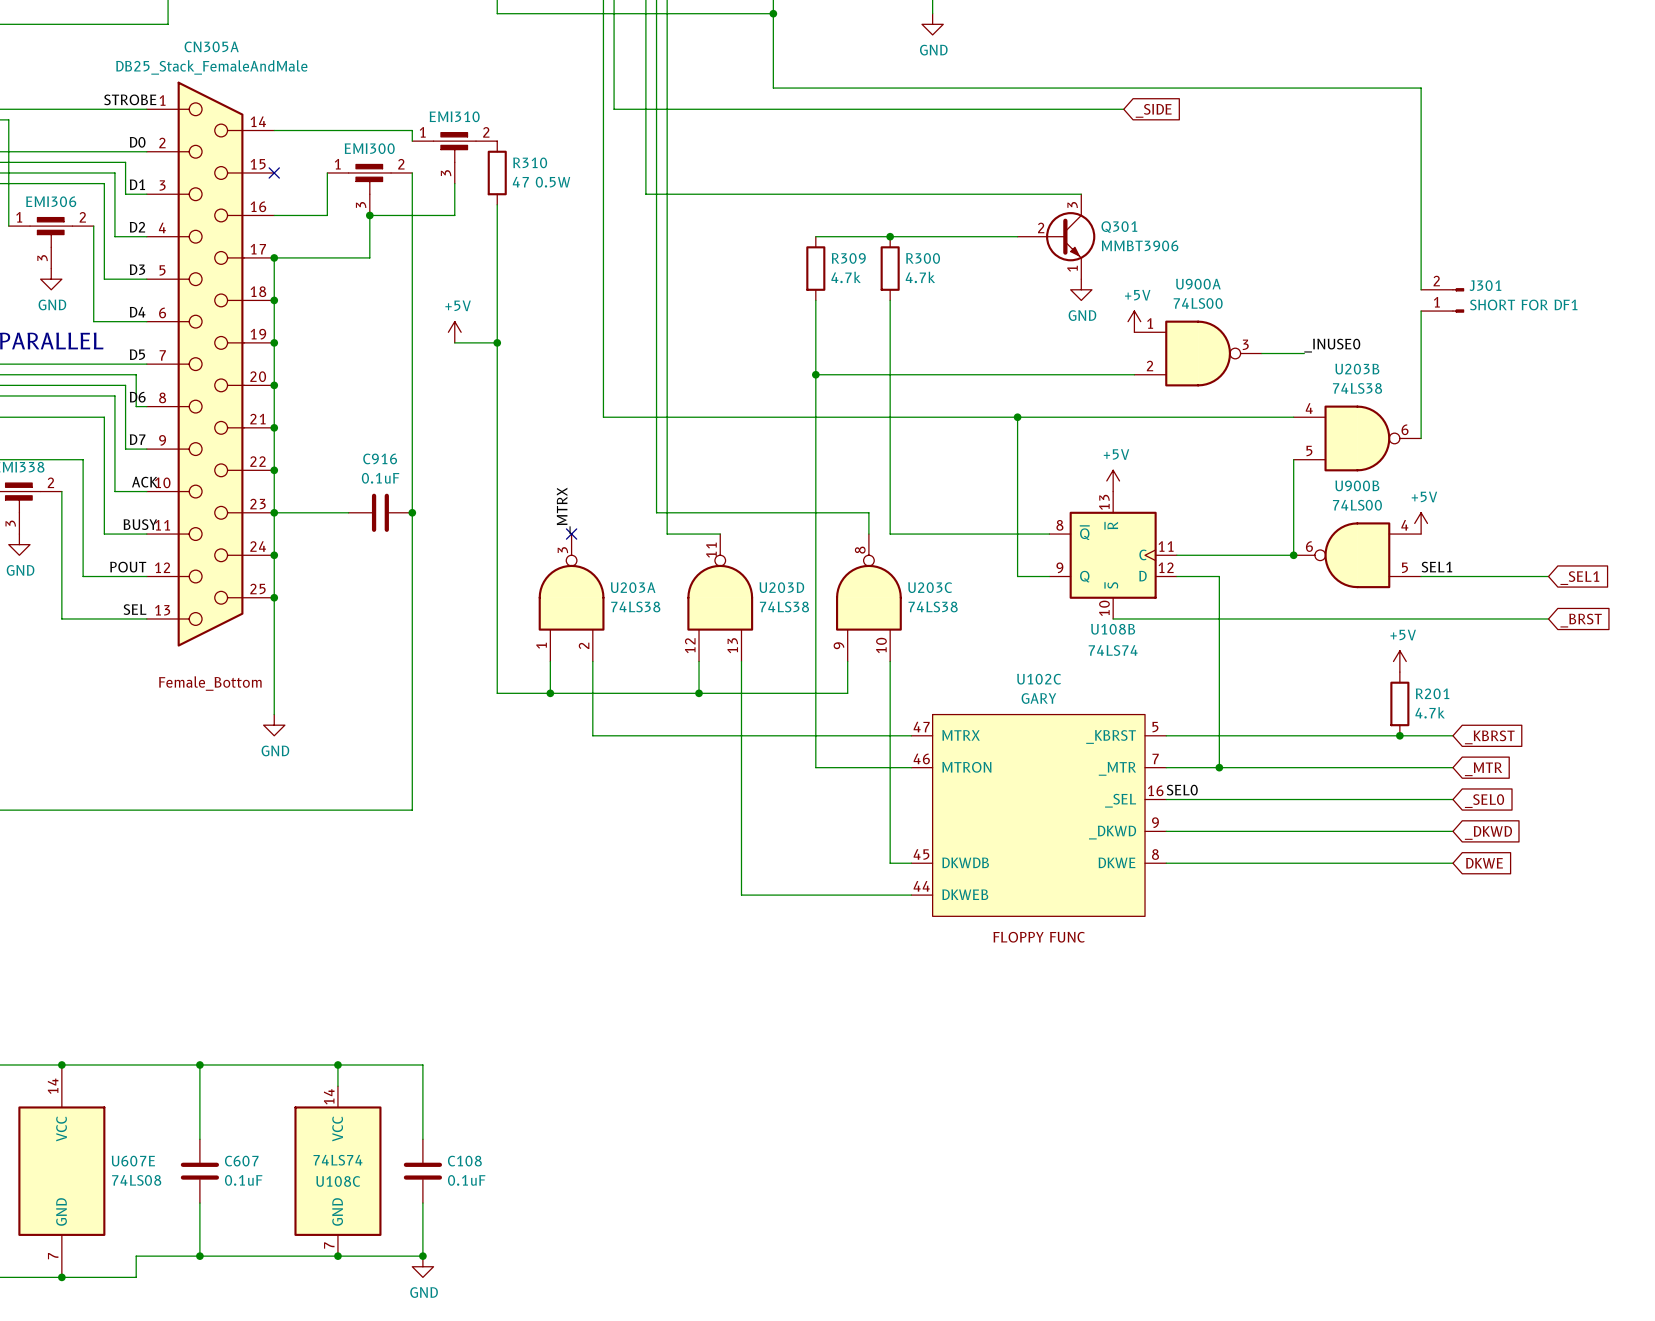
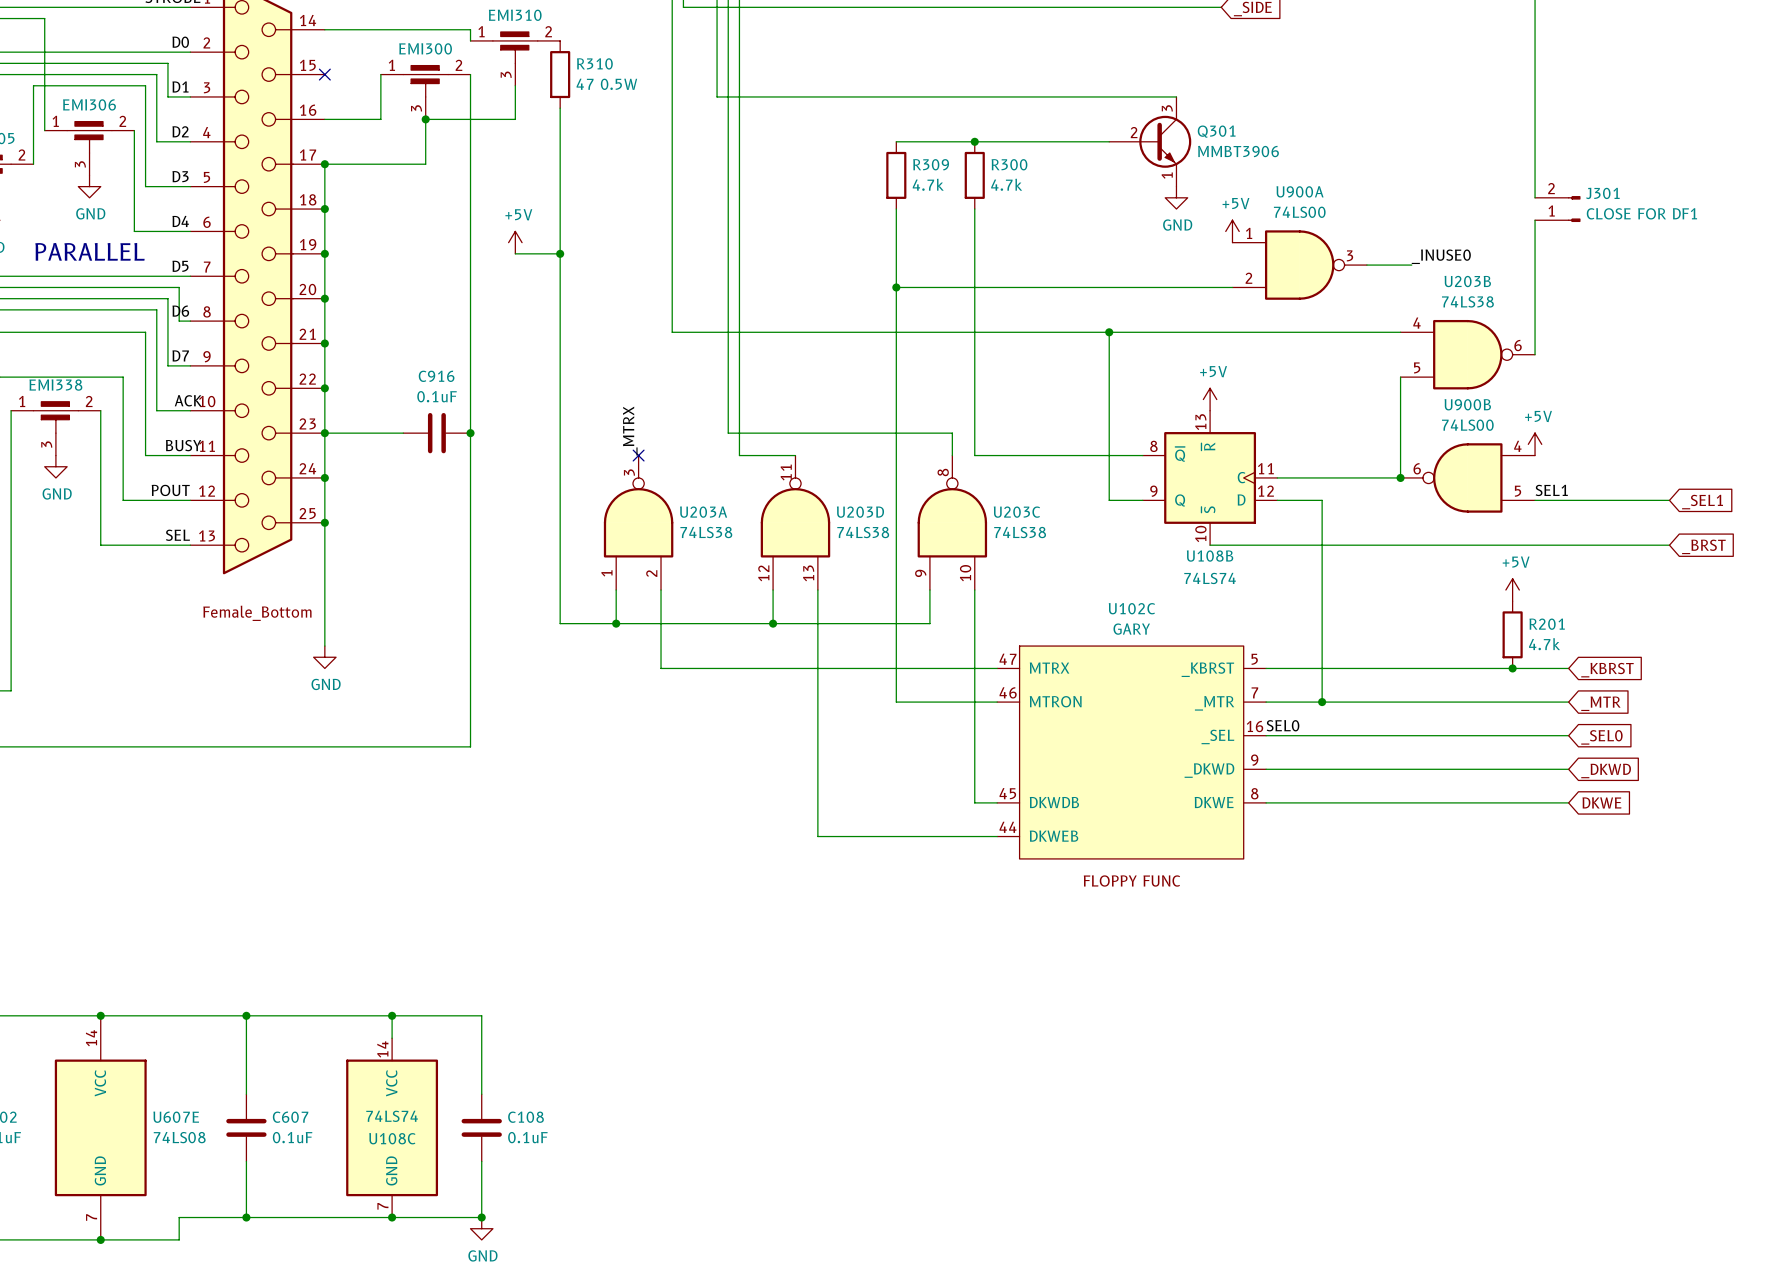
J301 value: SHORT FOR DF1 (1523, 304) -> CLOSE FOR DF1 (1641, 213)

